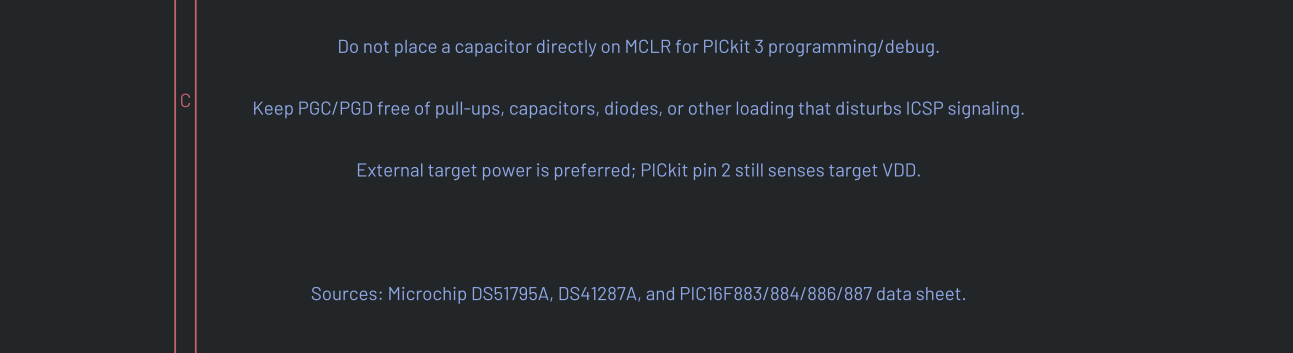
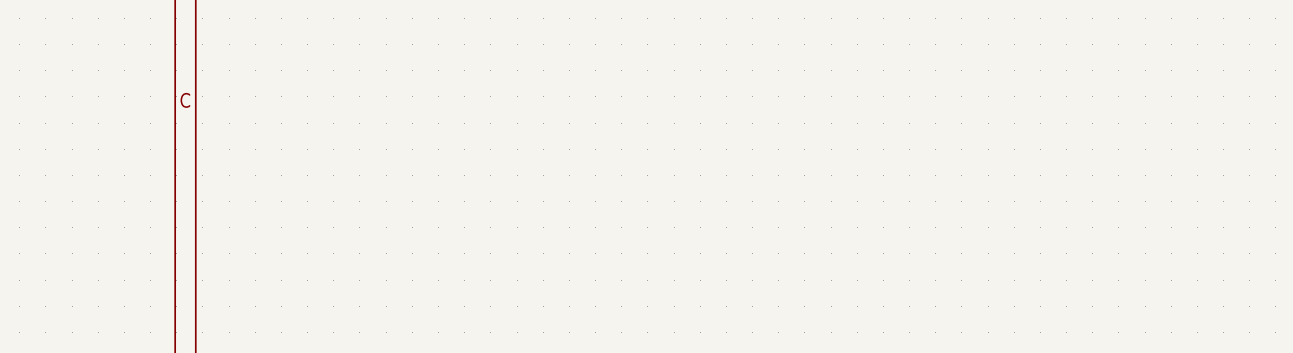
text: Do not place a capacitor directly on MCLR for PICkit 3 programming/debug. (638, 48) -> none
text: Keep PGC/PGD free of pull-ups, capacitors, diodes, or other loading that disturbs ICSP signaling. (638, 109) -> none
text: External target power is preferred; PICkit pin 2 still senses target VDD. (638, 171) -> none
text: Sources: Microchip DS51795A, DS41287A, and PIC16F883/884/886/887 data sheet. (638, 295) -> none

